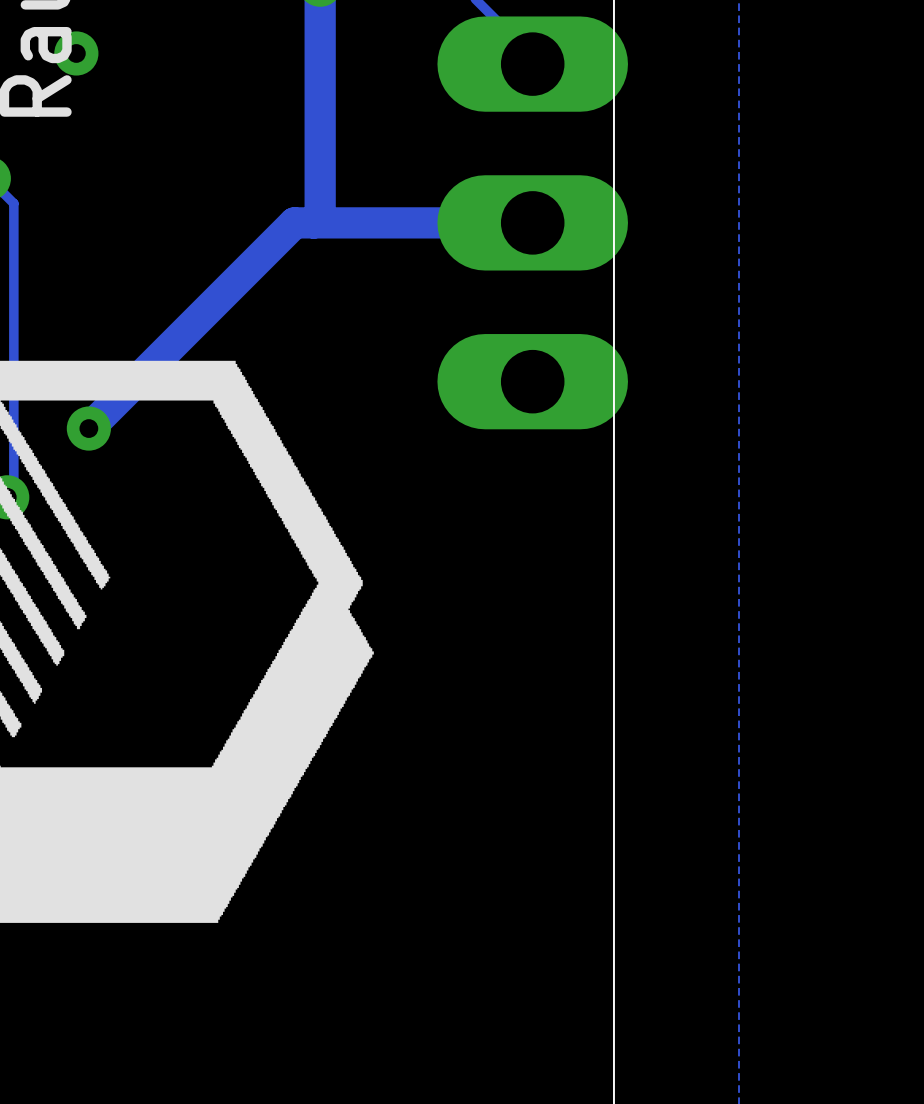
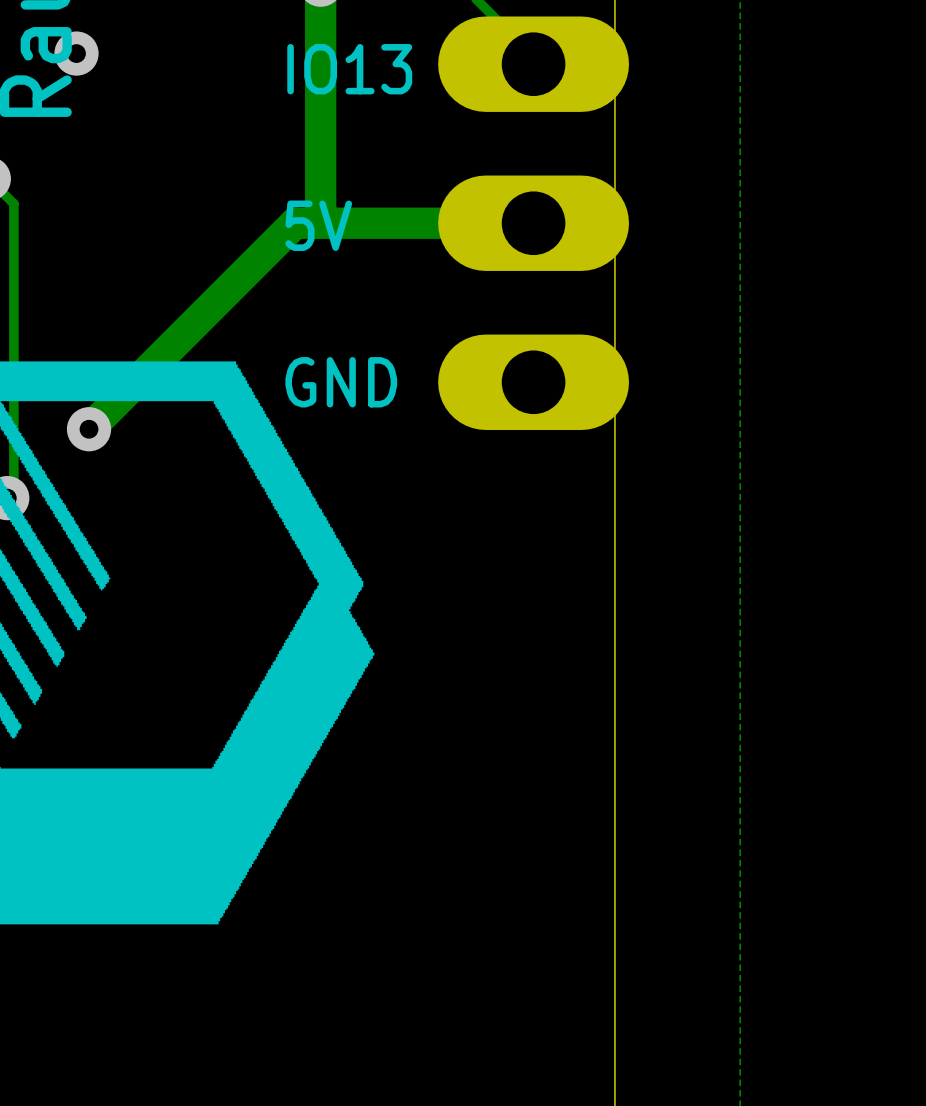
text: none -> IO13 (349, 69)
text: none -> 5V (318, 225)
text: none -> GND (341, 382)

